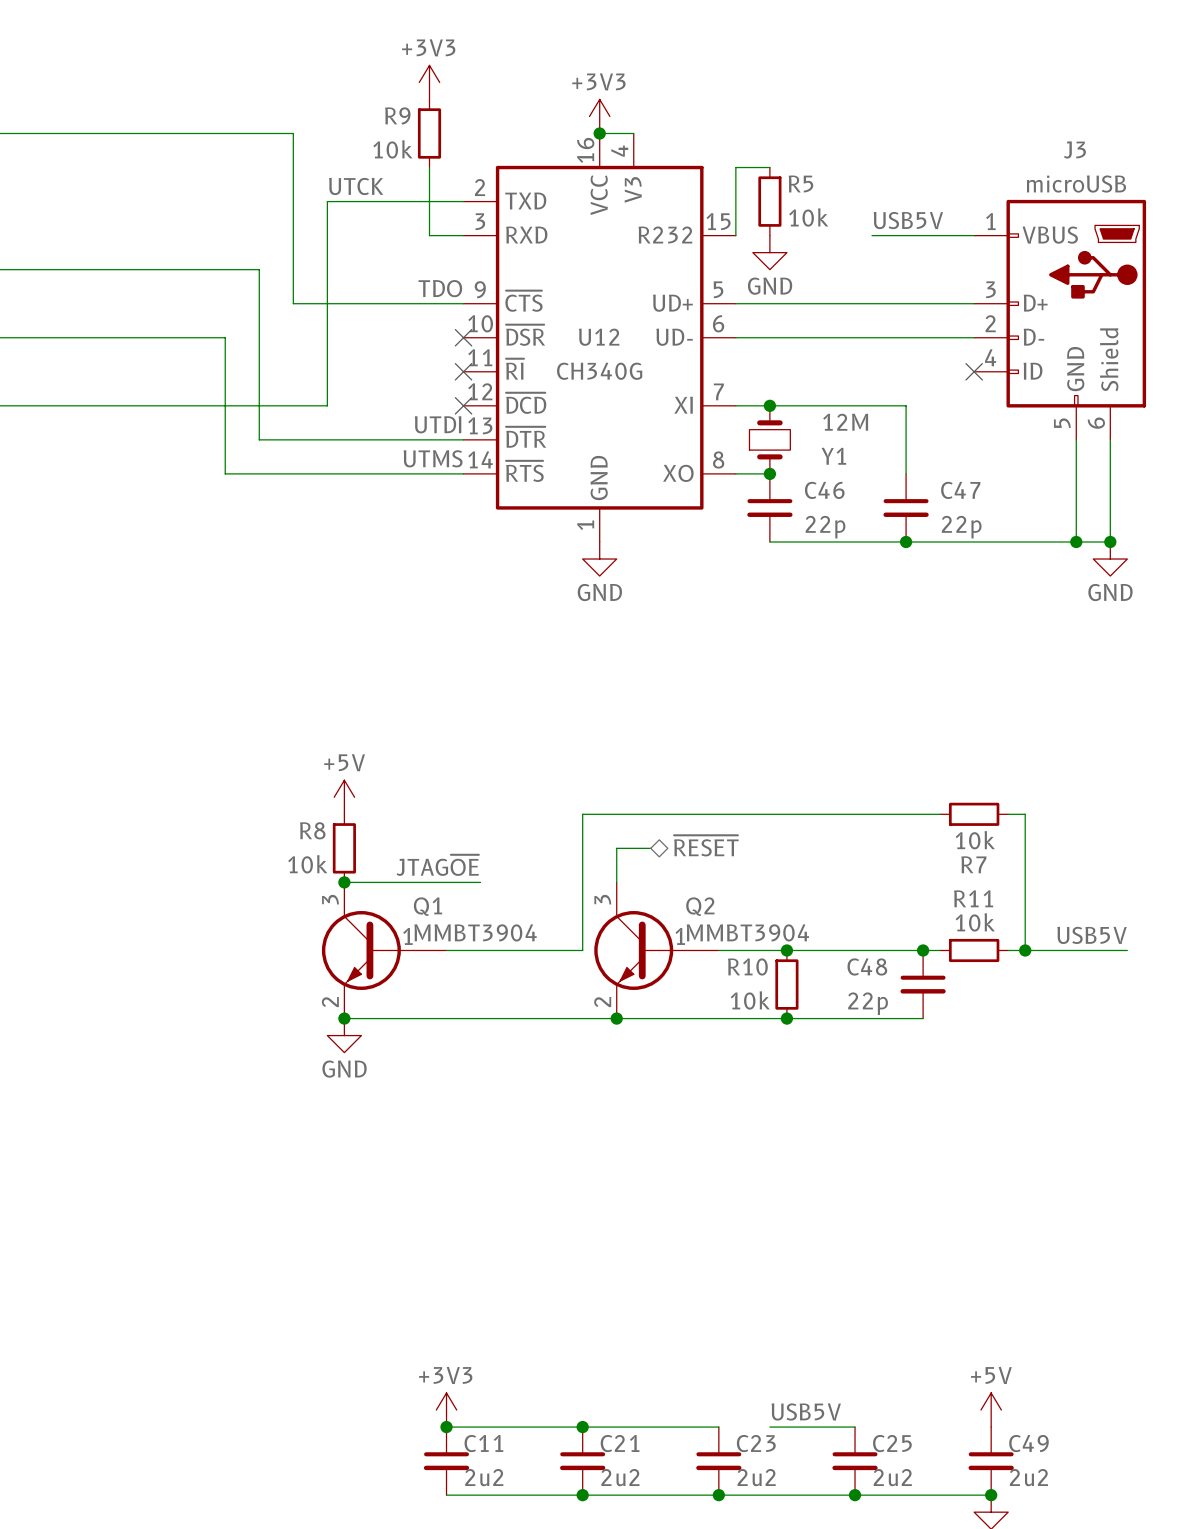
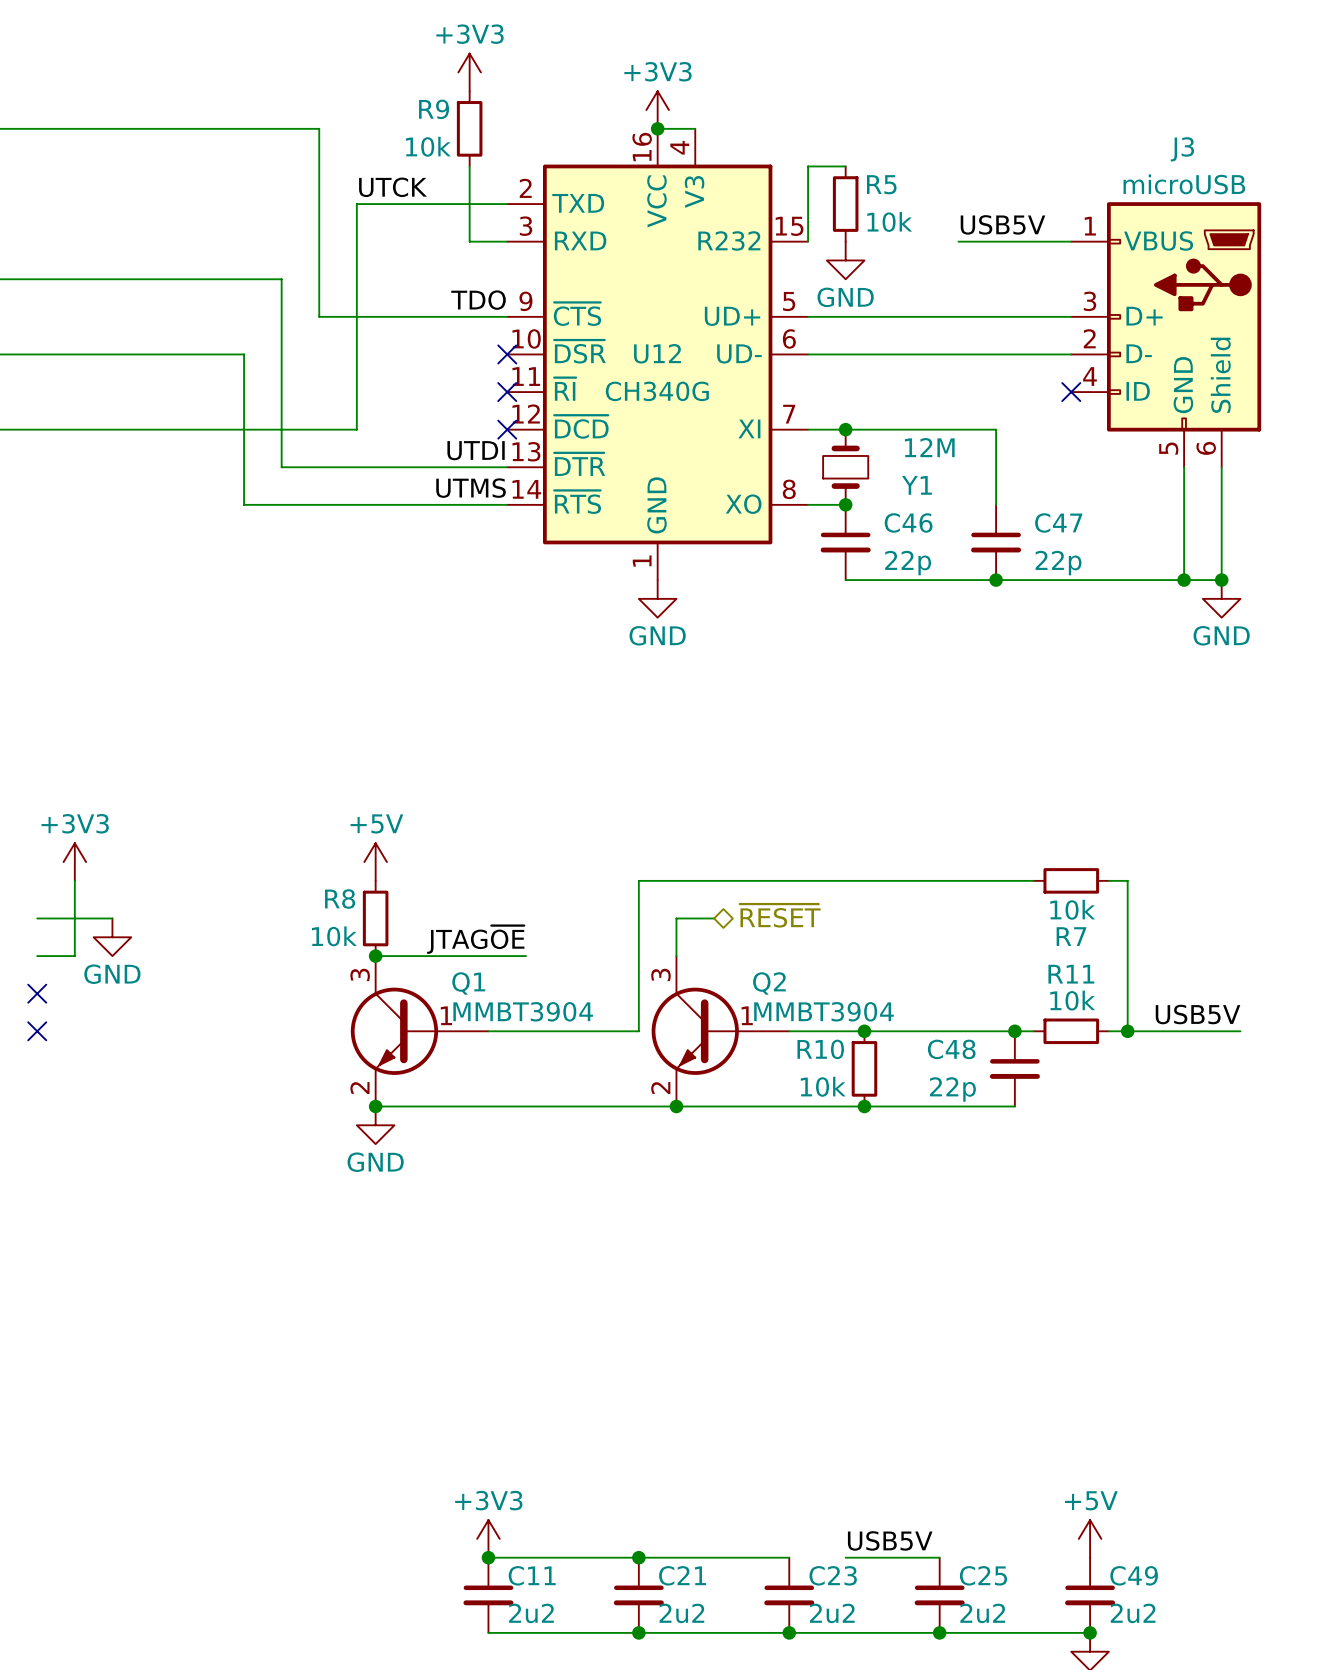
power symbol: none -> +3V3 (74, 862)
wire: none -> (74, 880) (74, 956) (37, 956)
wire: none -> (37, 918) (112, 918)
power symbol: none -> GND (112, 937)
no-connect mark: none -> (37, 993)
no-connect mark: none -> (37, 1031)

